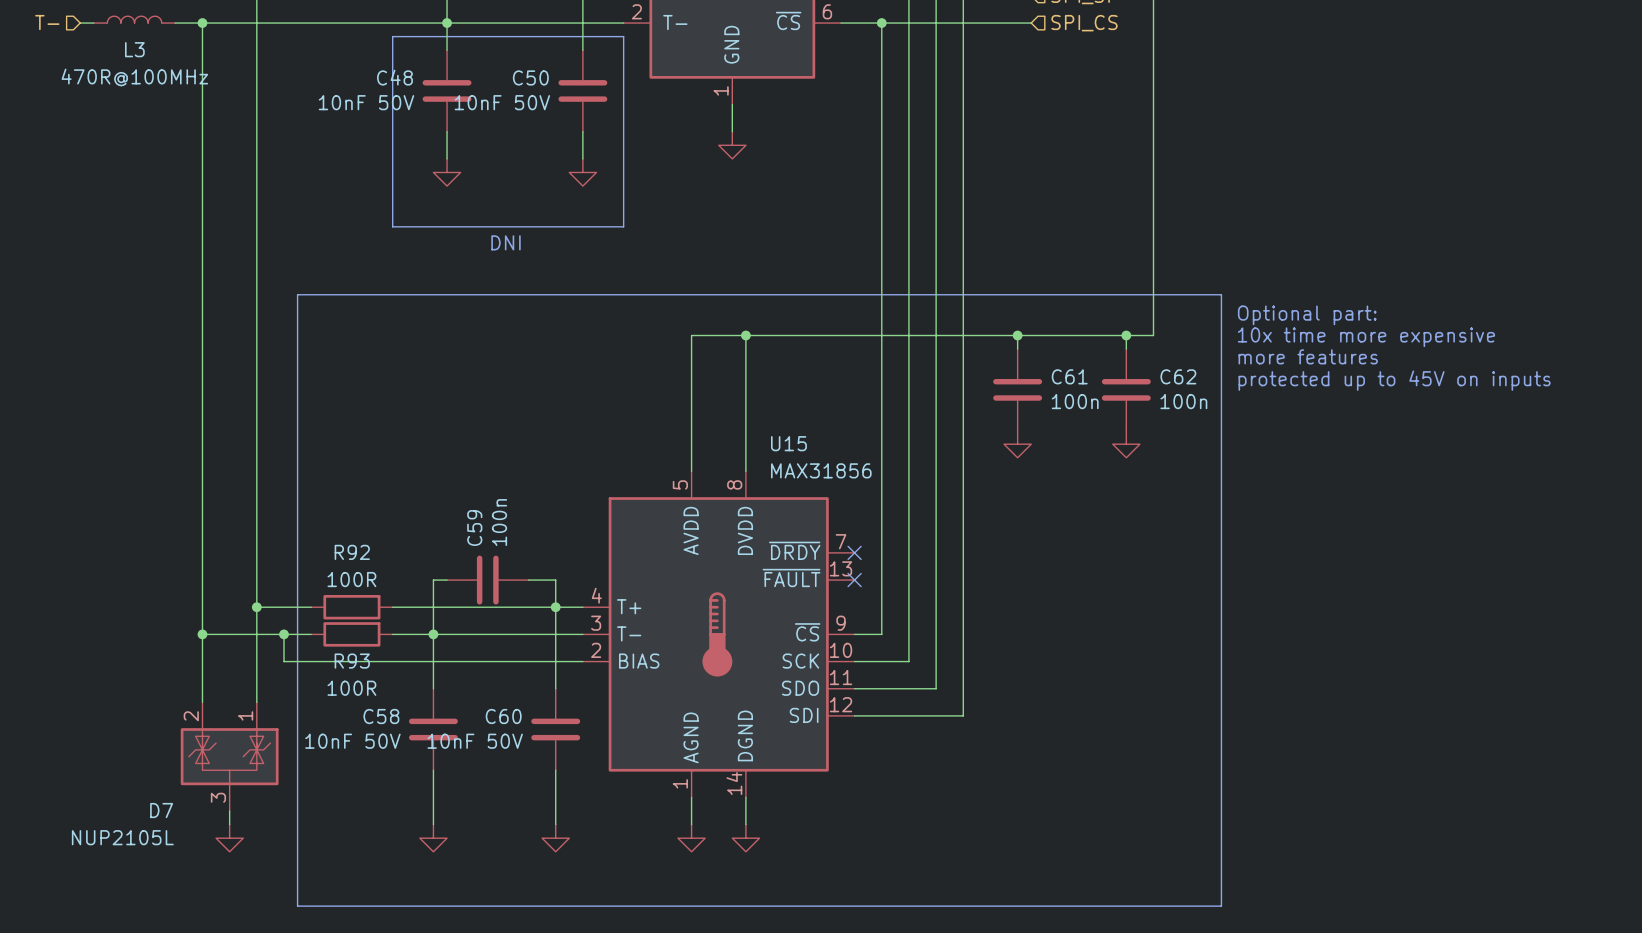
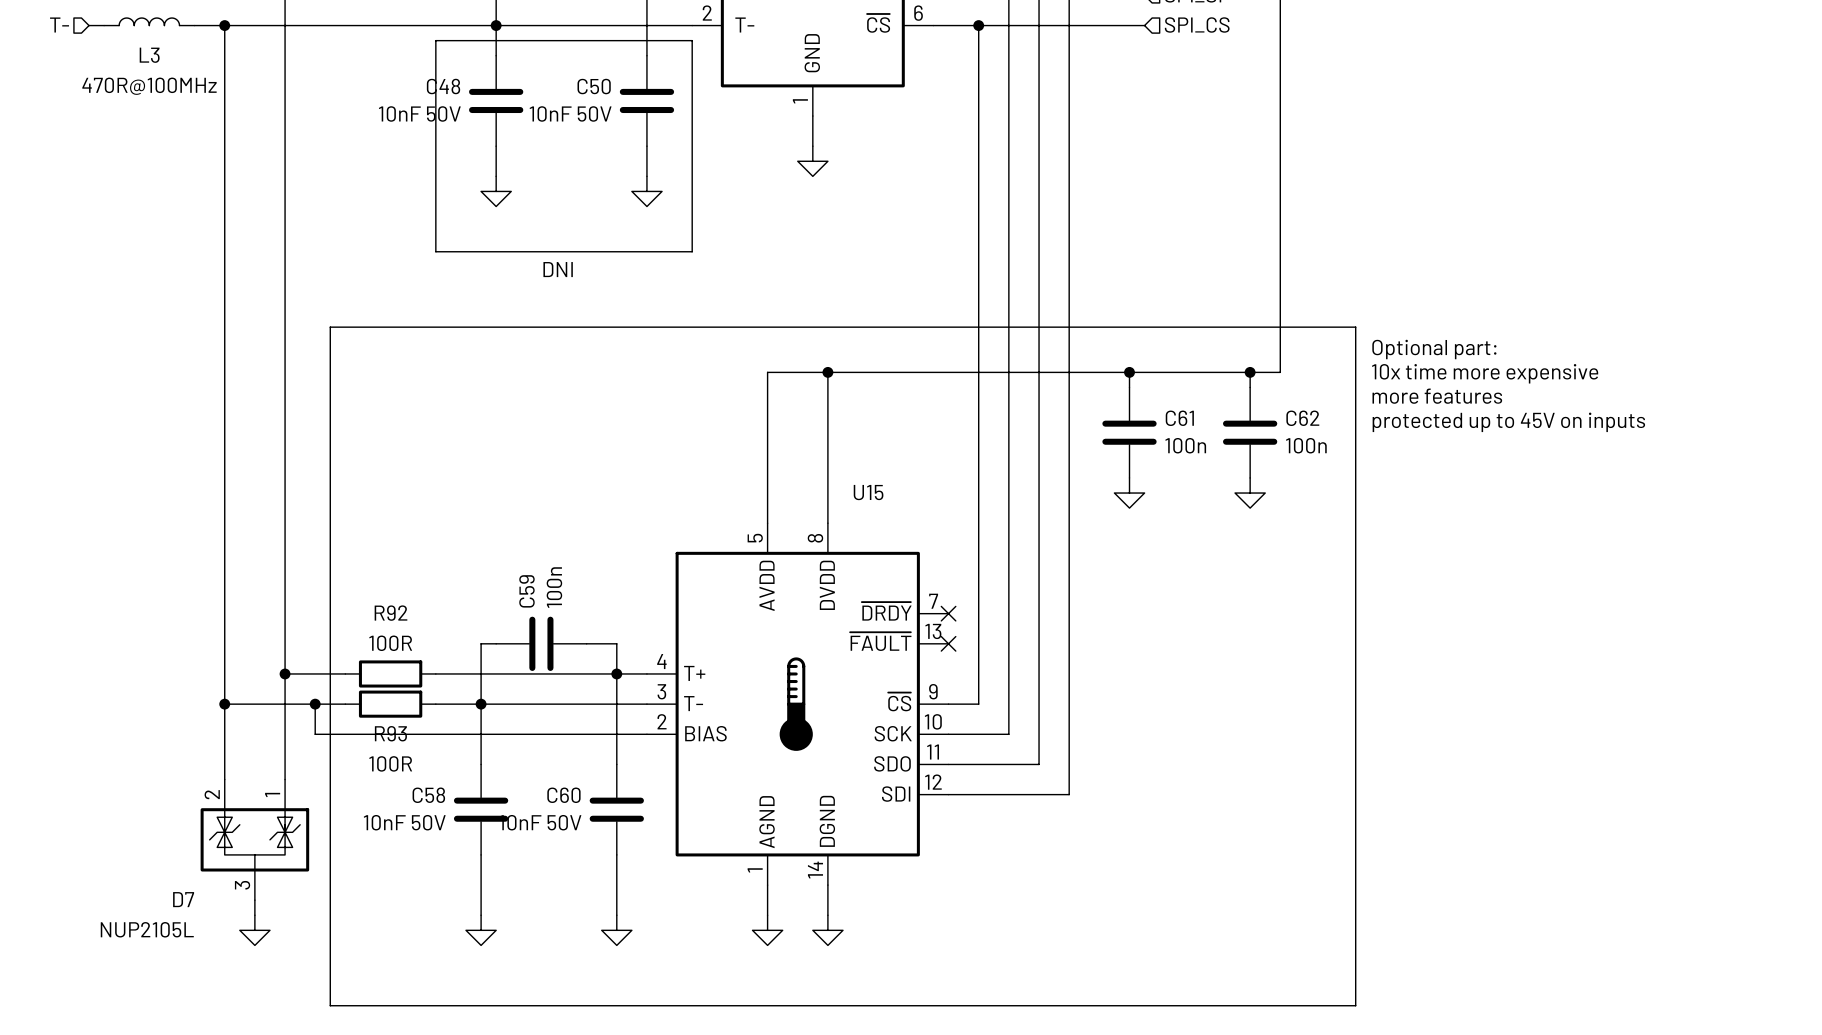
U15 value: MAX31856 (821, 470) -> none

